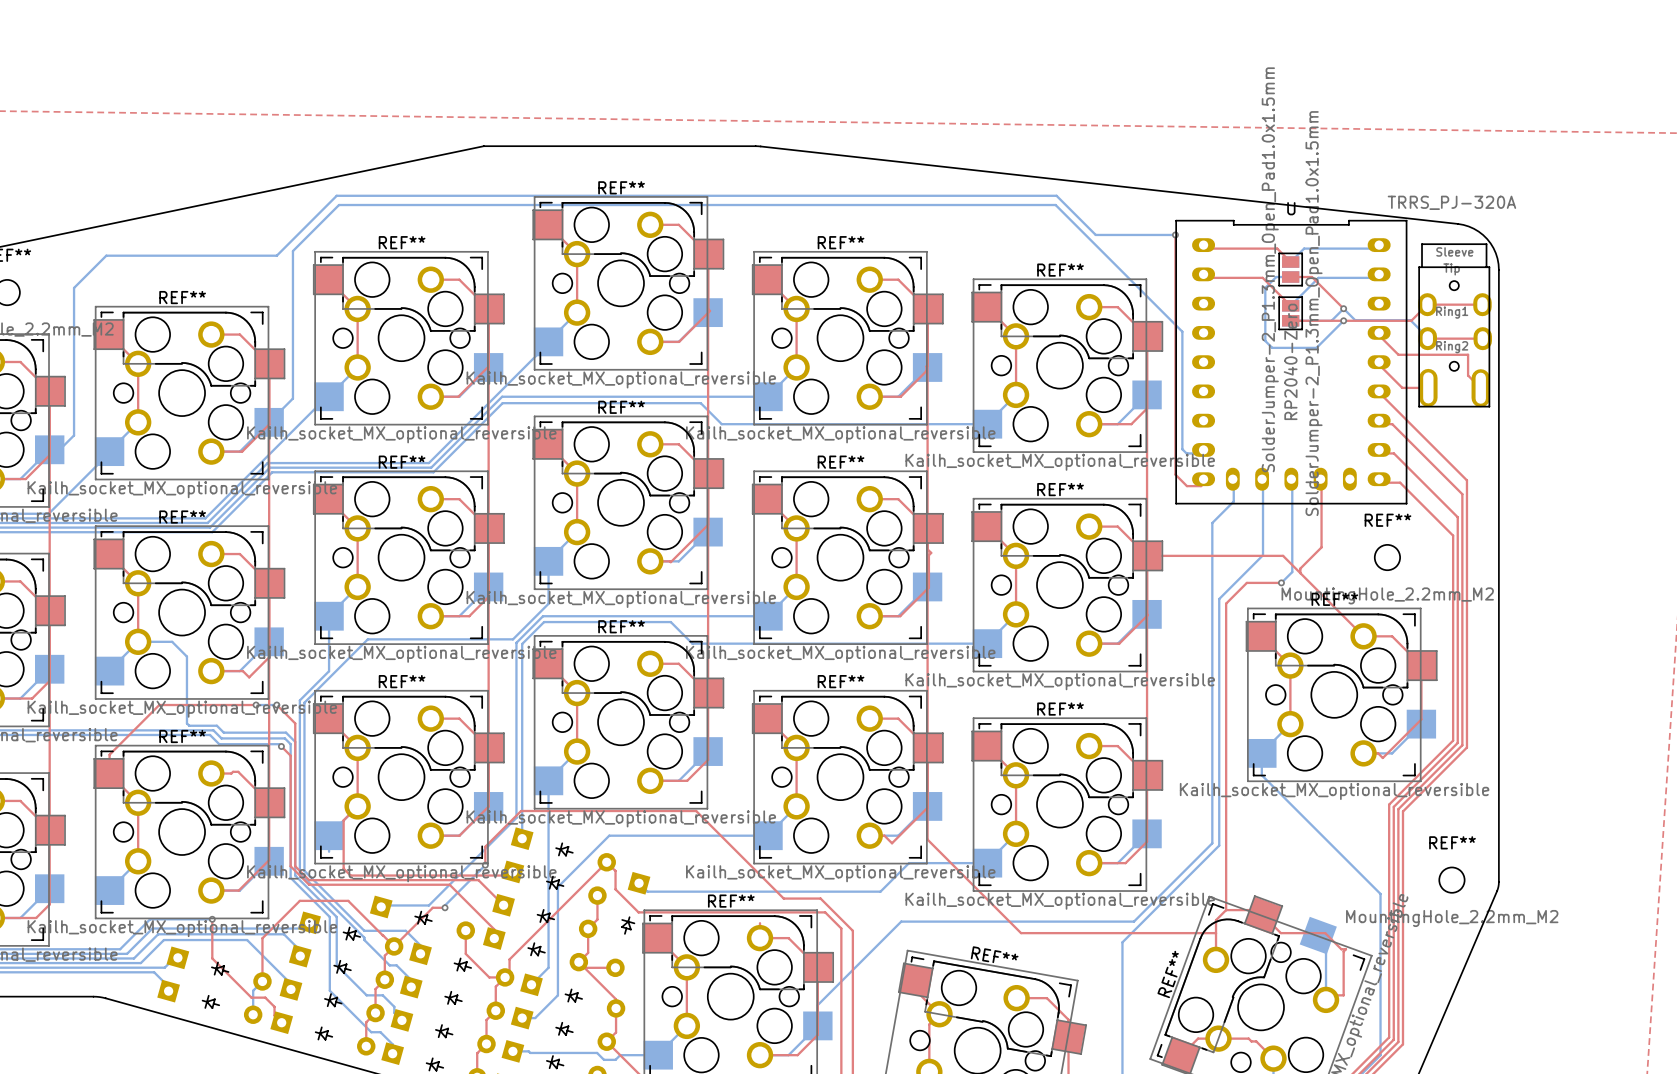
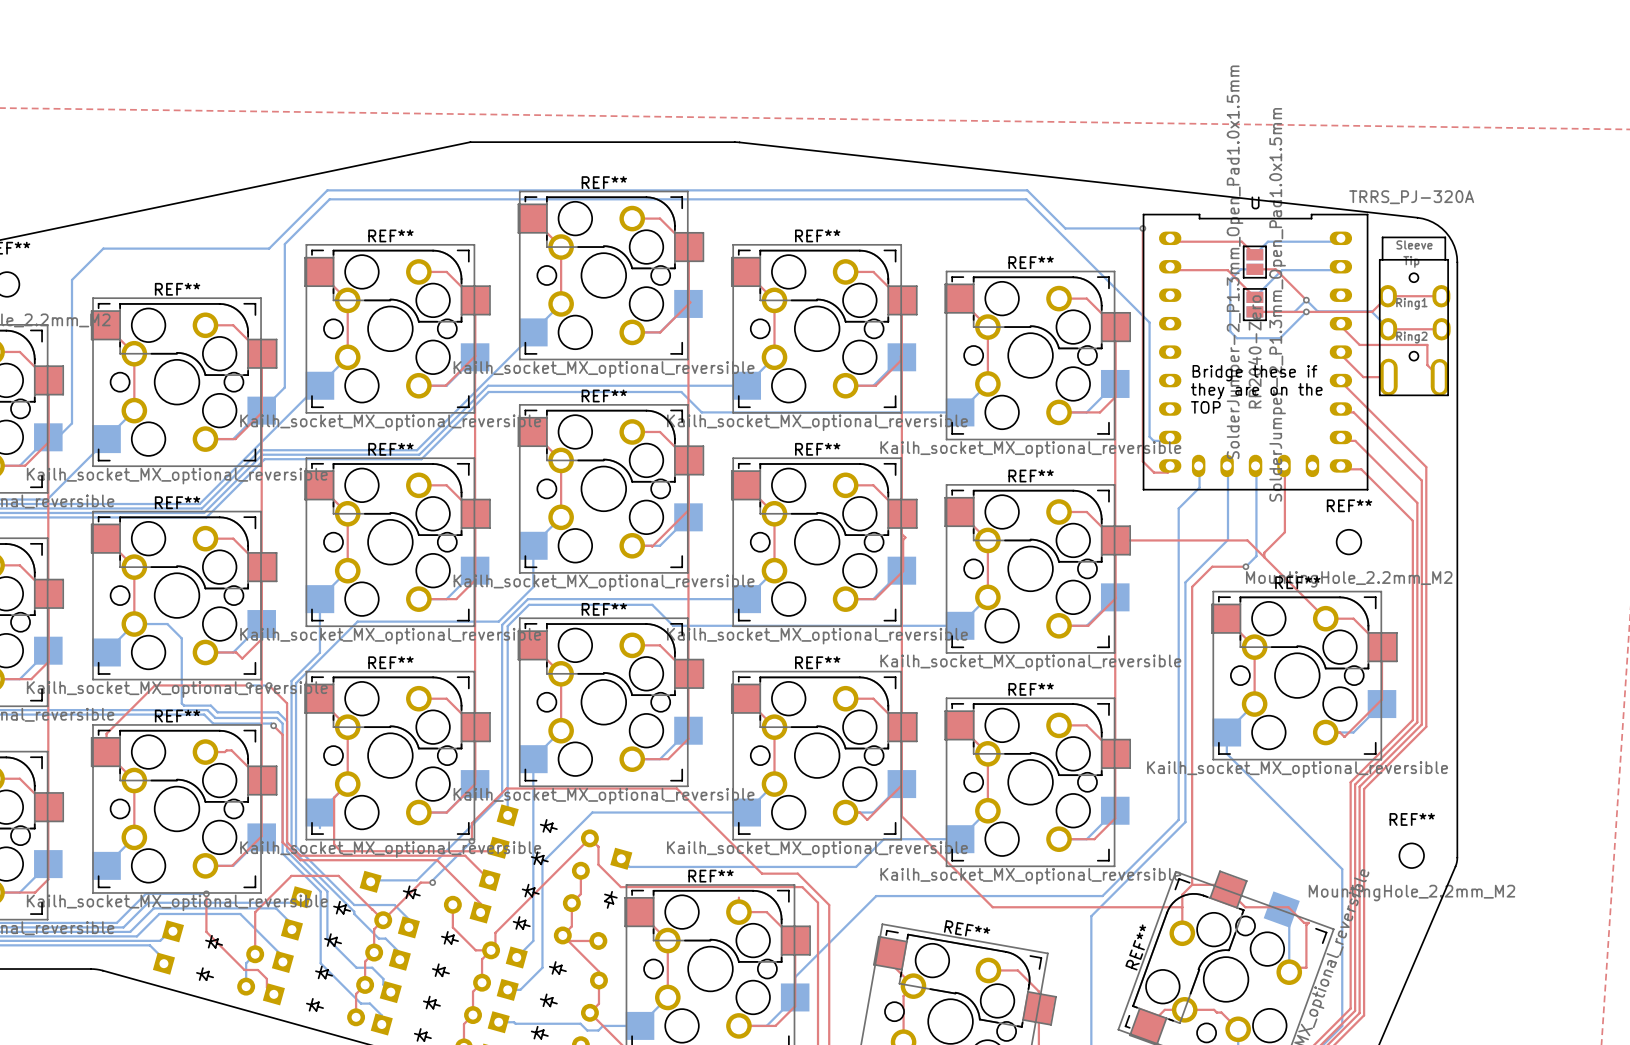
text: none -> Bridge these if (1254, 373)
text: none -> they are on the (1256, 391)
text: none -> TOP (1205, 407)

